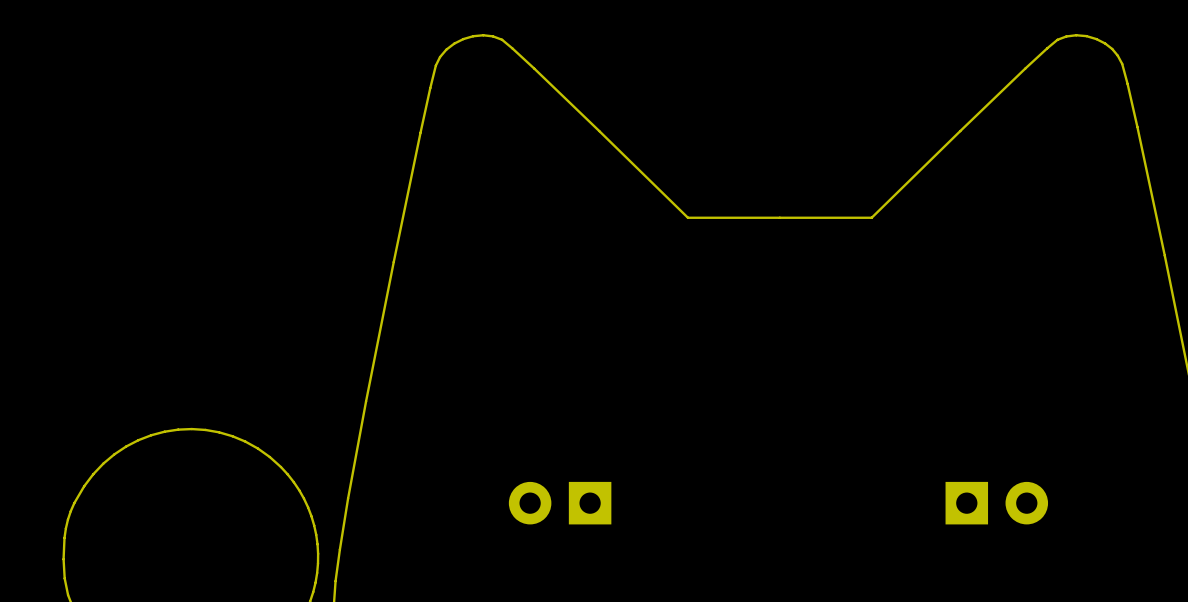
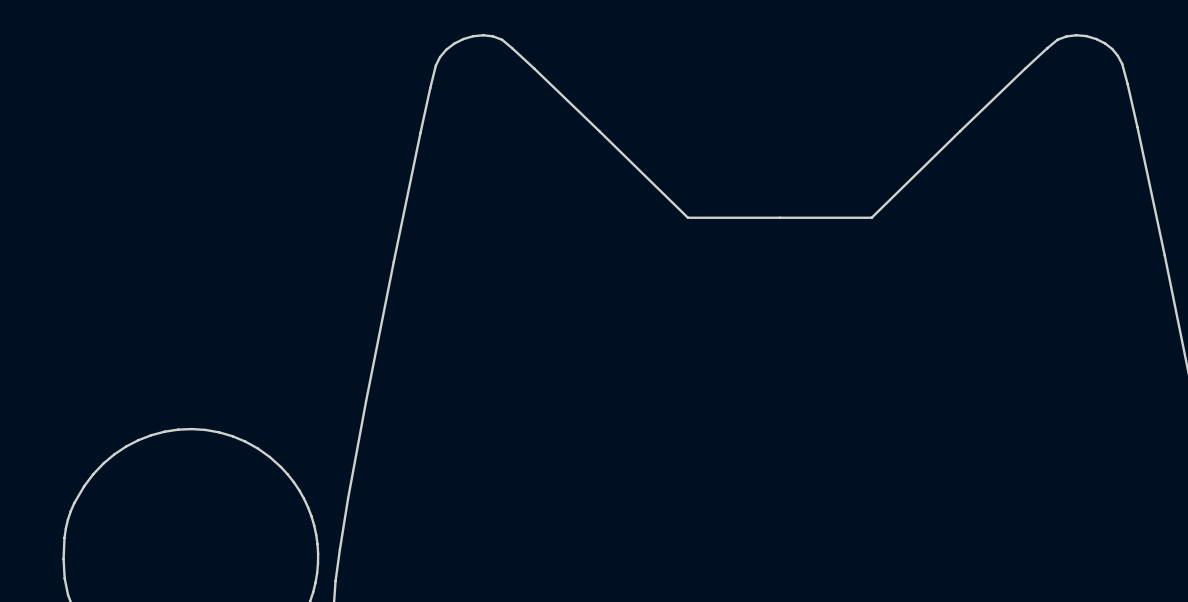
part: (560, 503) -> none
part: (996, 503) -> none

